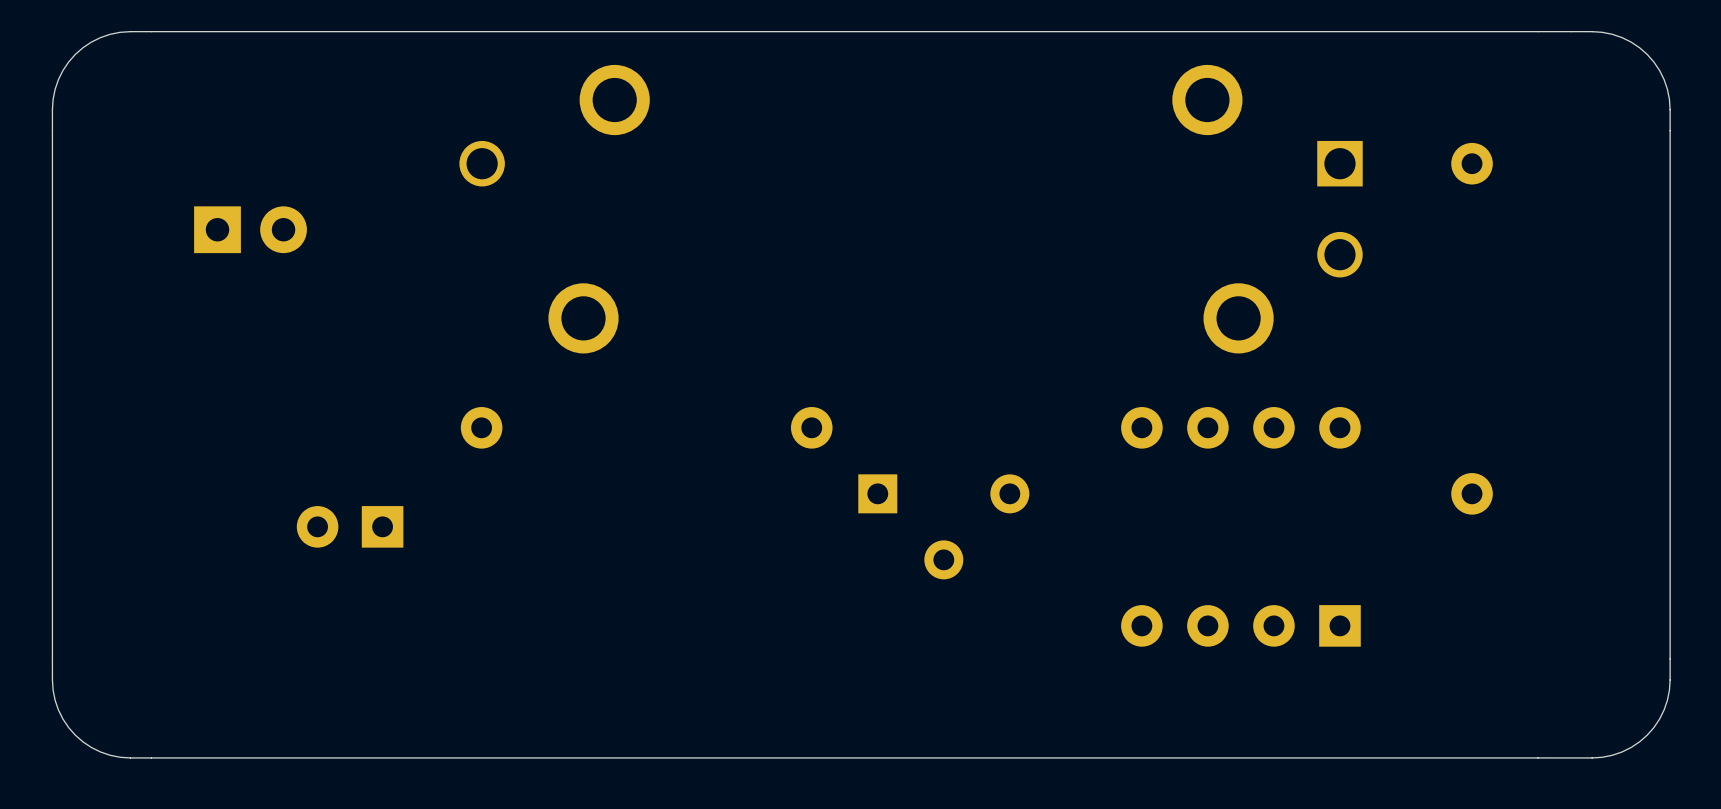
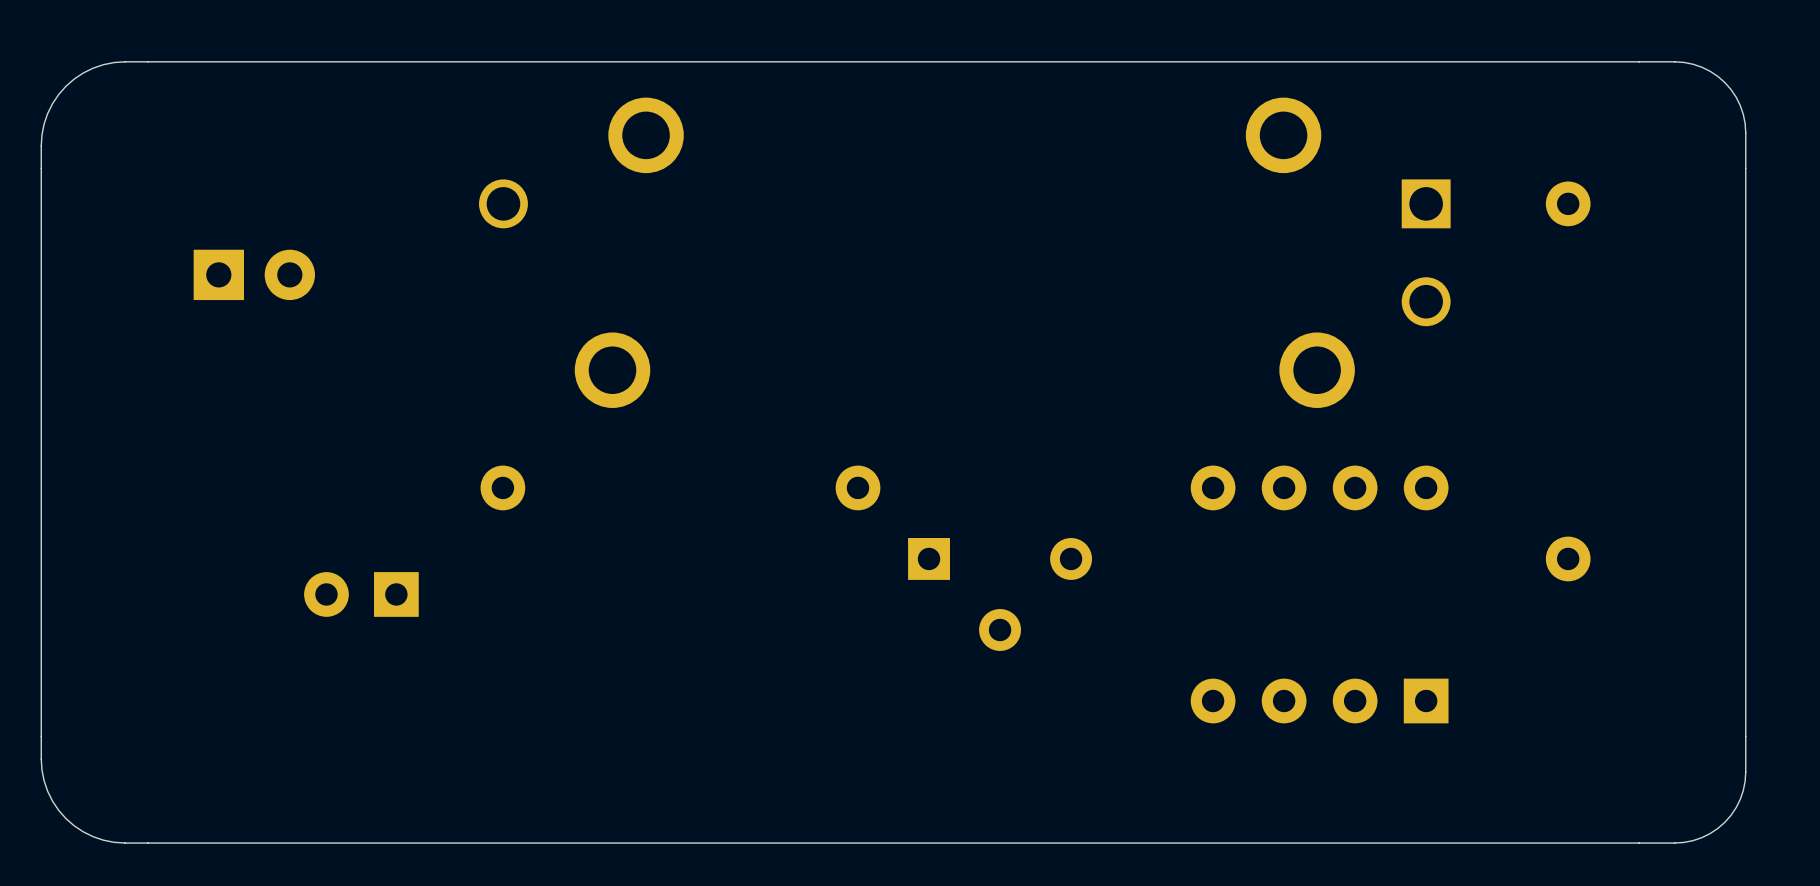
board edge: (1571, 31) (1612, 34) (1639, 47) (1659, 70) (1667, 89) (1670, 109) (1669, 690) (1659, 718) (1639, 741) (1612, 755) (1571, 757) -> (1674, 61) (1701, 67) (1724, 82) (1740, 105) (1745, 132) (1745, 781) (1736, 807) (1717, 828) (1693, 840) (1674, 843)

